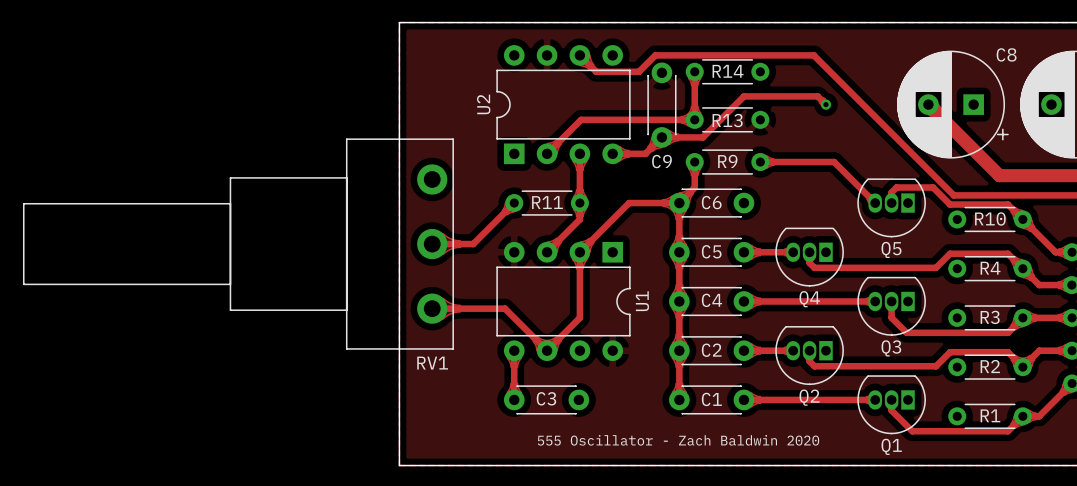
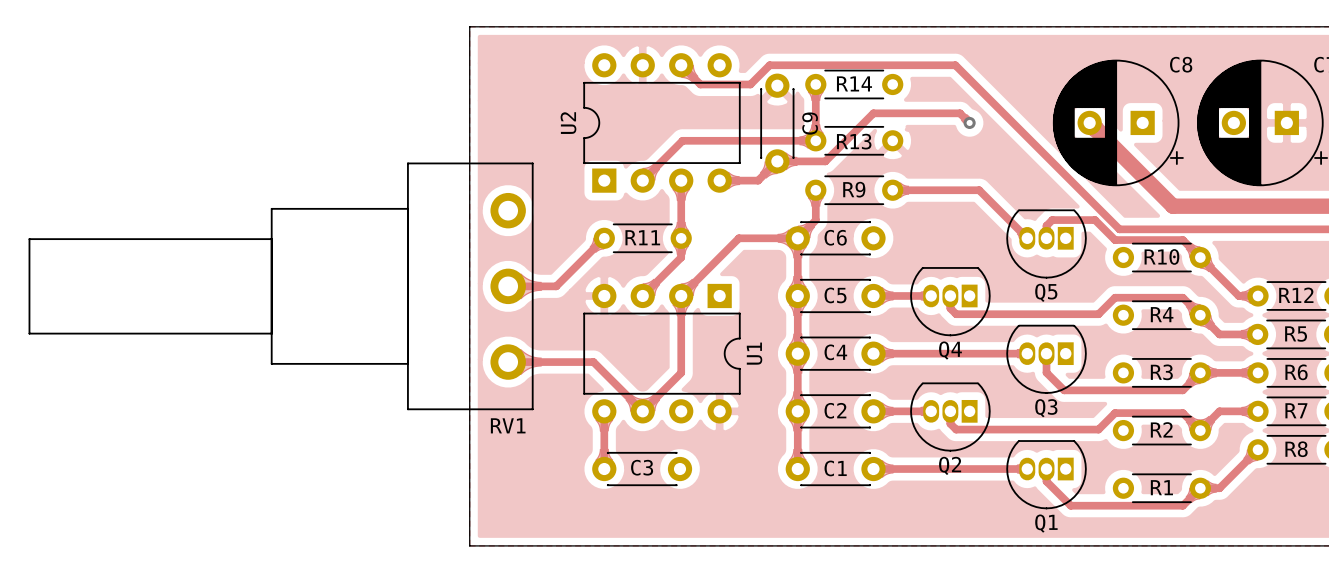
C9 name rotation: 0° (661, 161) -> 90° counterclockwise (810, 123)
C9 name position: C9 (661, 161) -> C9 (810, 123)
text: 555 Oscillator - Zach Baldwin 2020 (678, 440) -> none

